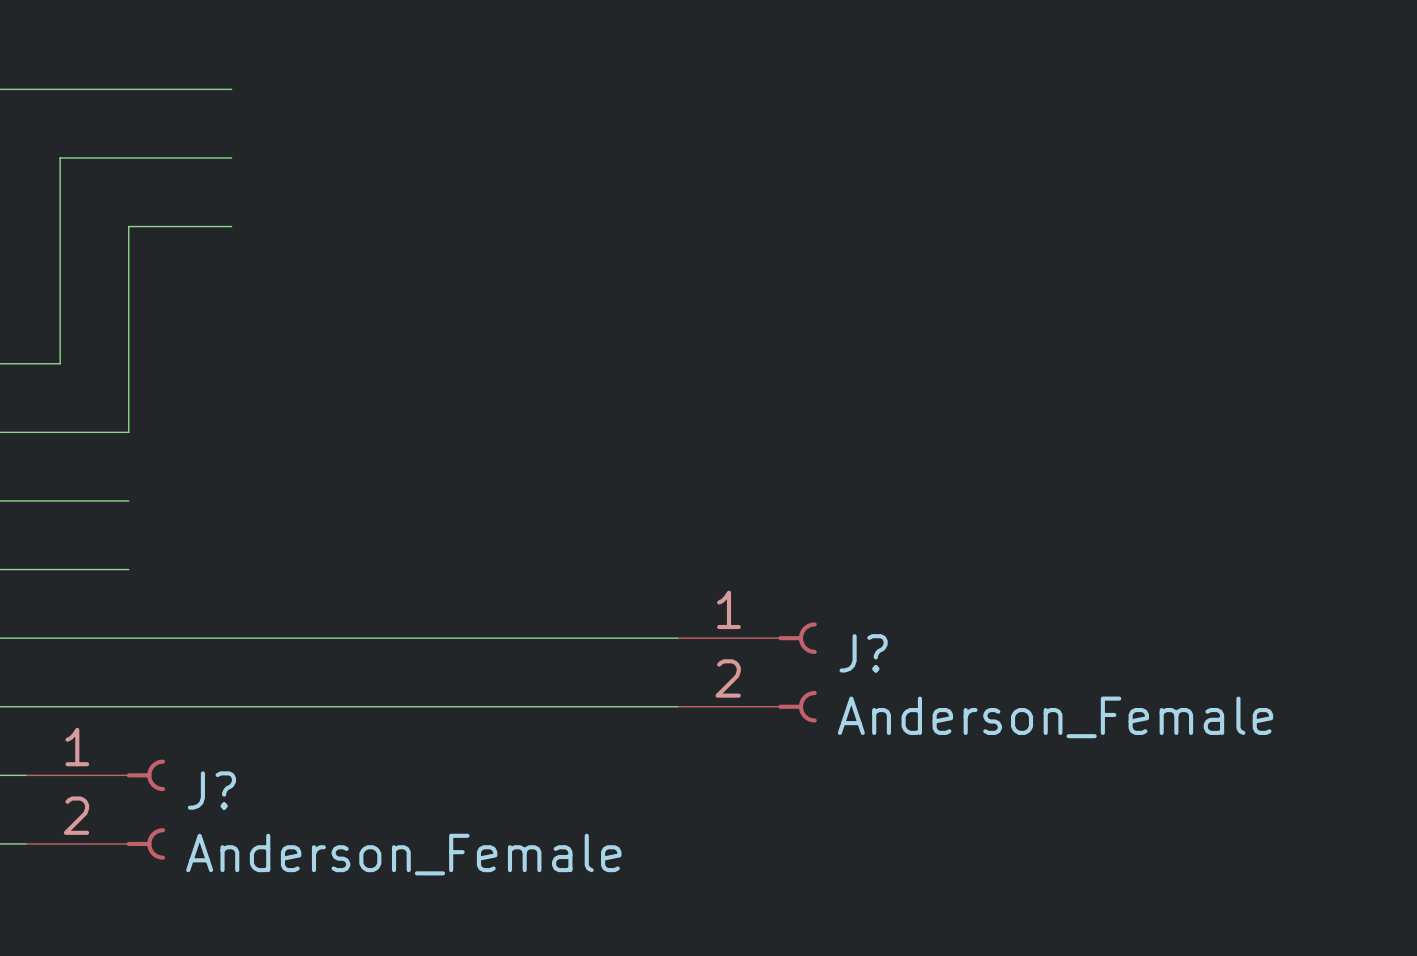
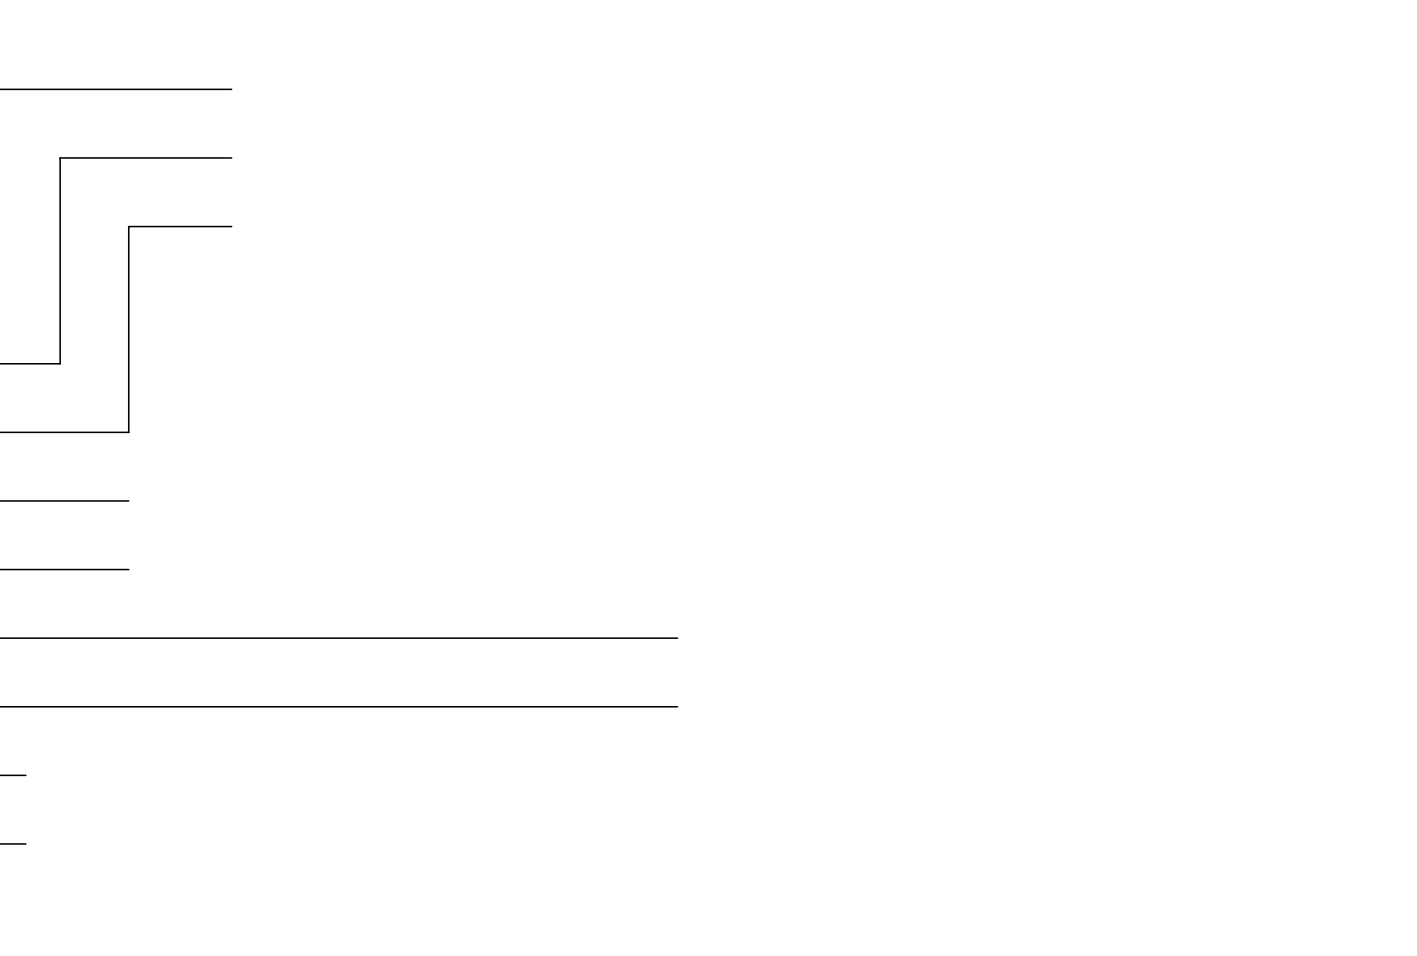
J?: Anderson_Female (747, 672) -> none
J?: Anderson_Female (95, 809) -> none

